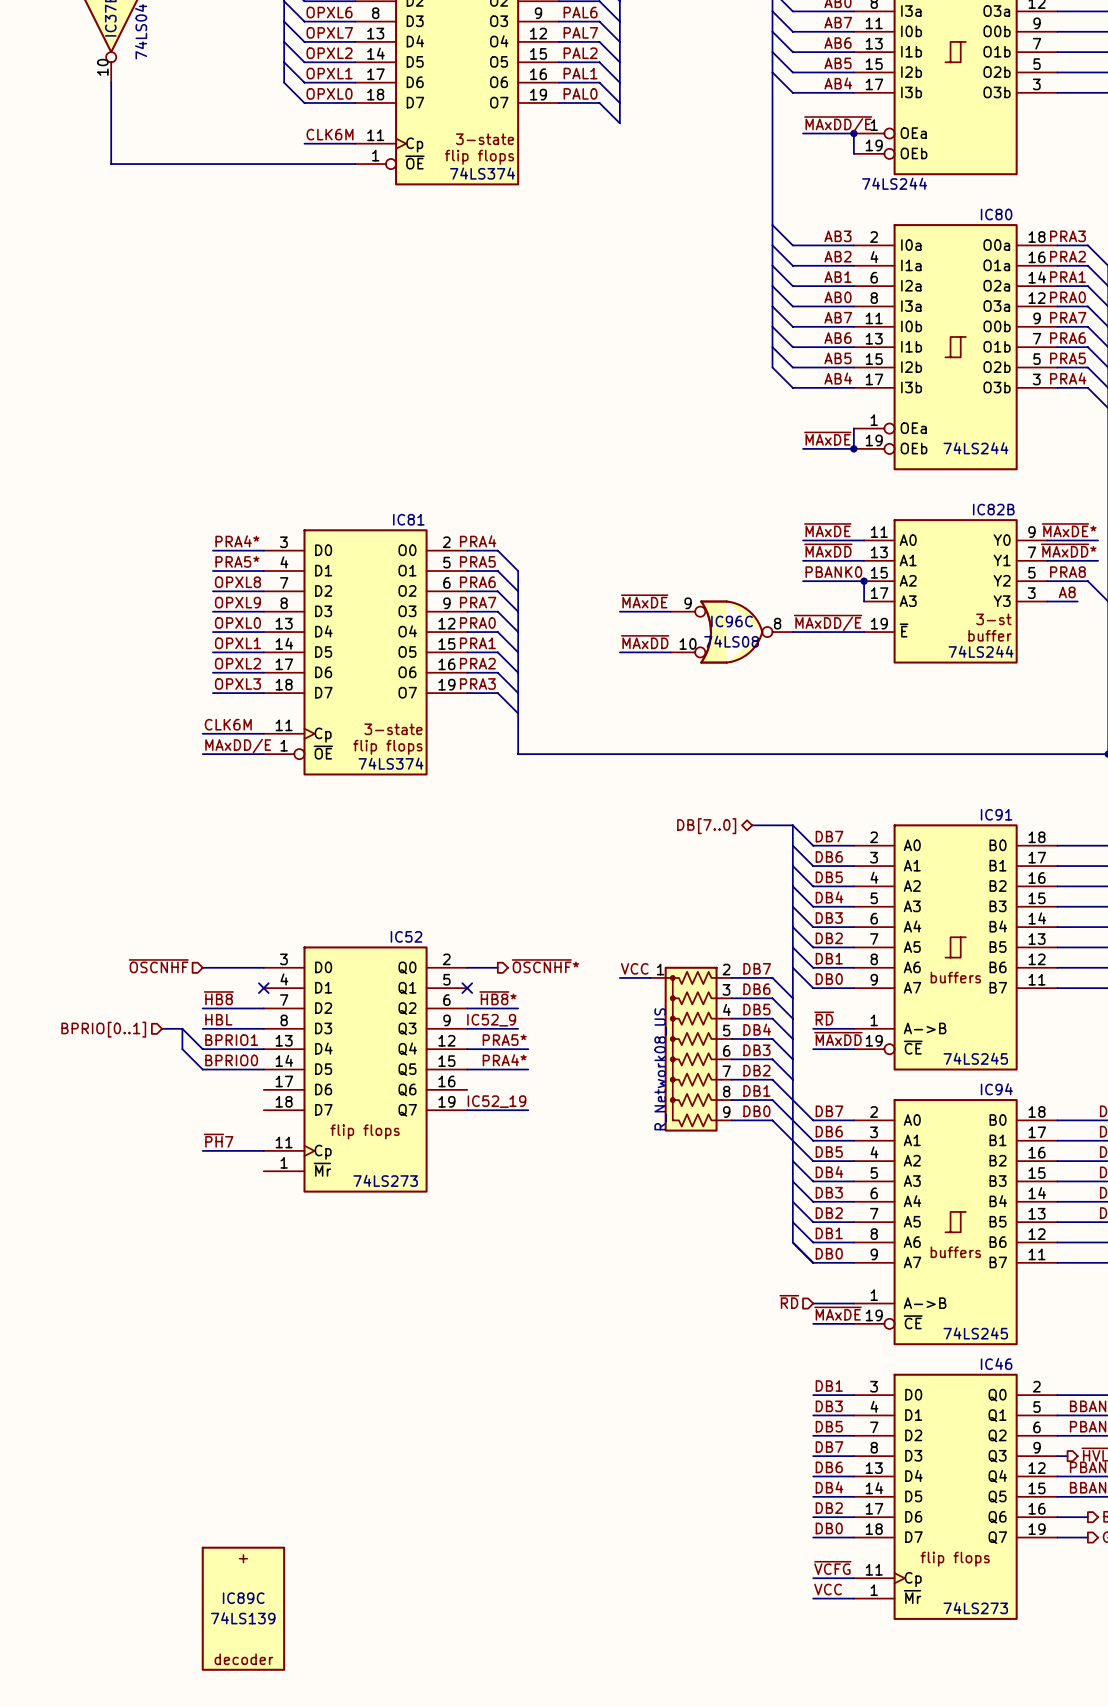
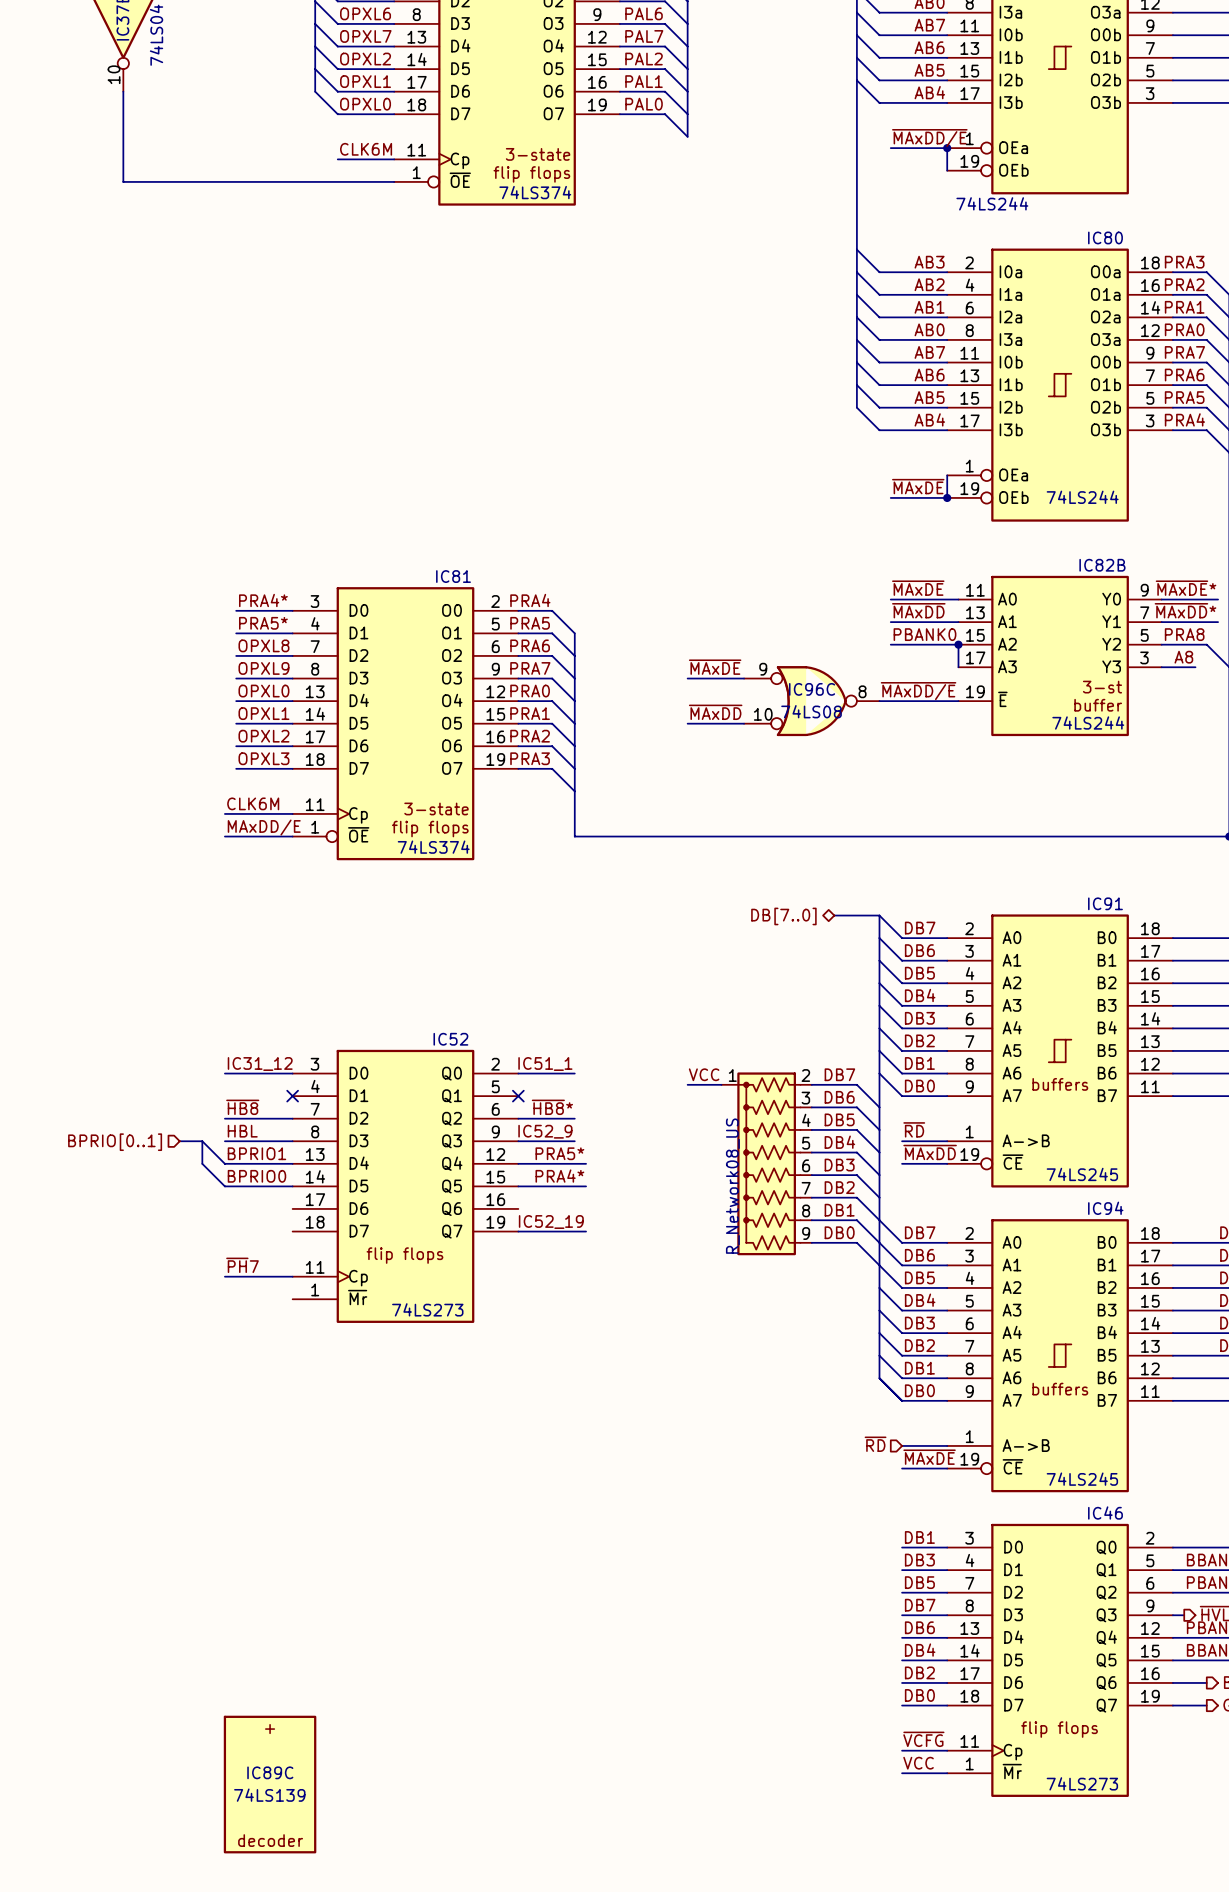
label: none -> IC31_12 (260, 1064)
label: none -> IC51_1 (545, 1064)
hierarchical label: ~{OSCNHF} (158, 966) -> none
hierarchical label: ~{OSCNHF}* (545, 966) -> none
wire: none -> (552, 1073) (574, 1073)

